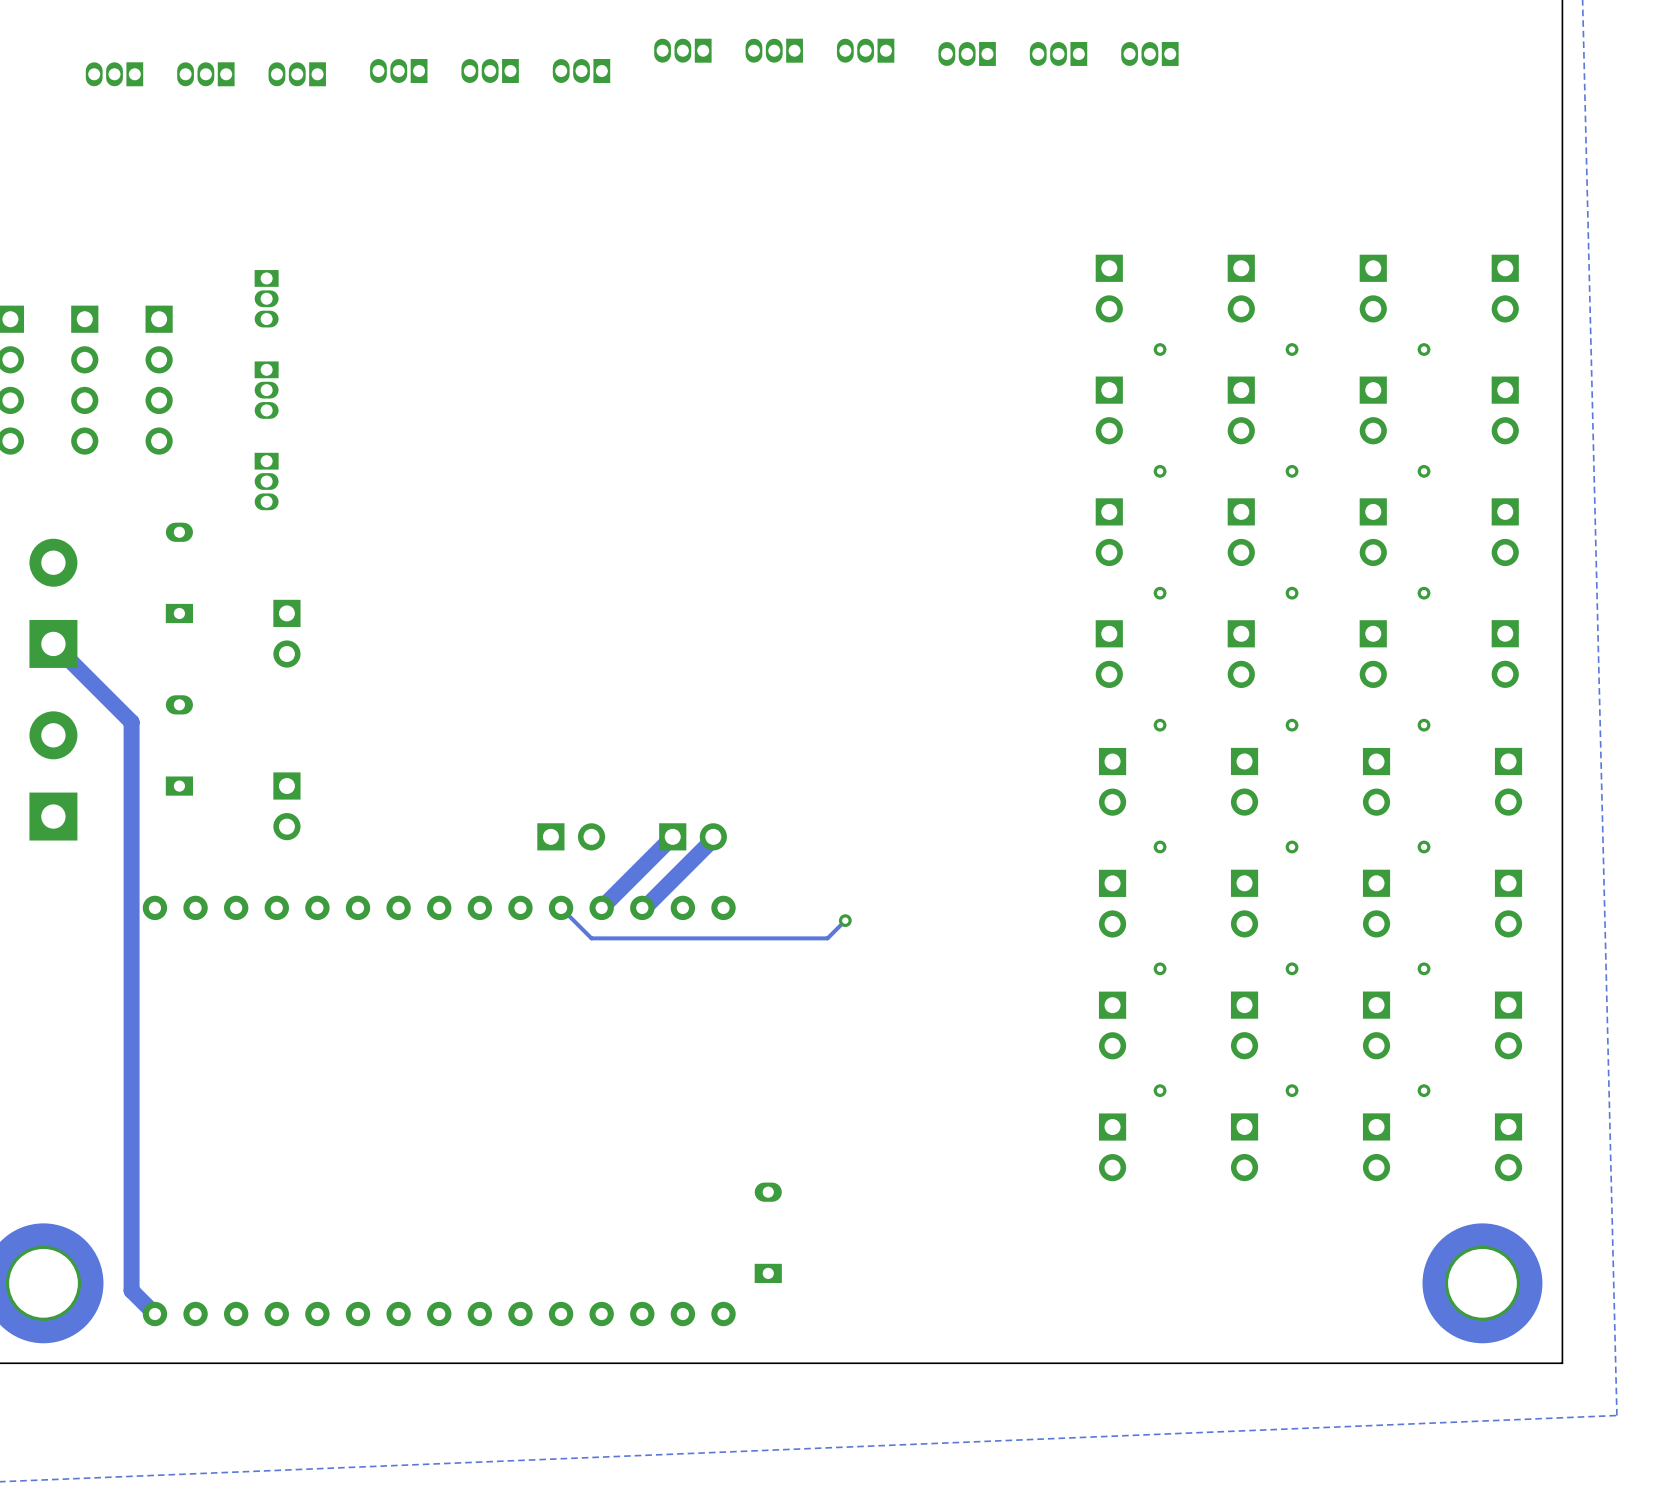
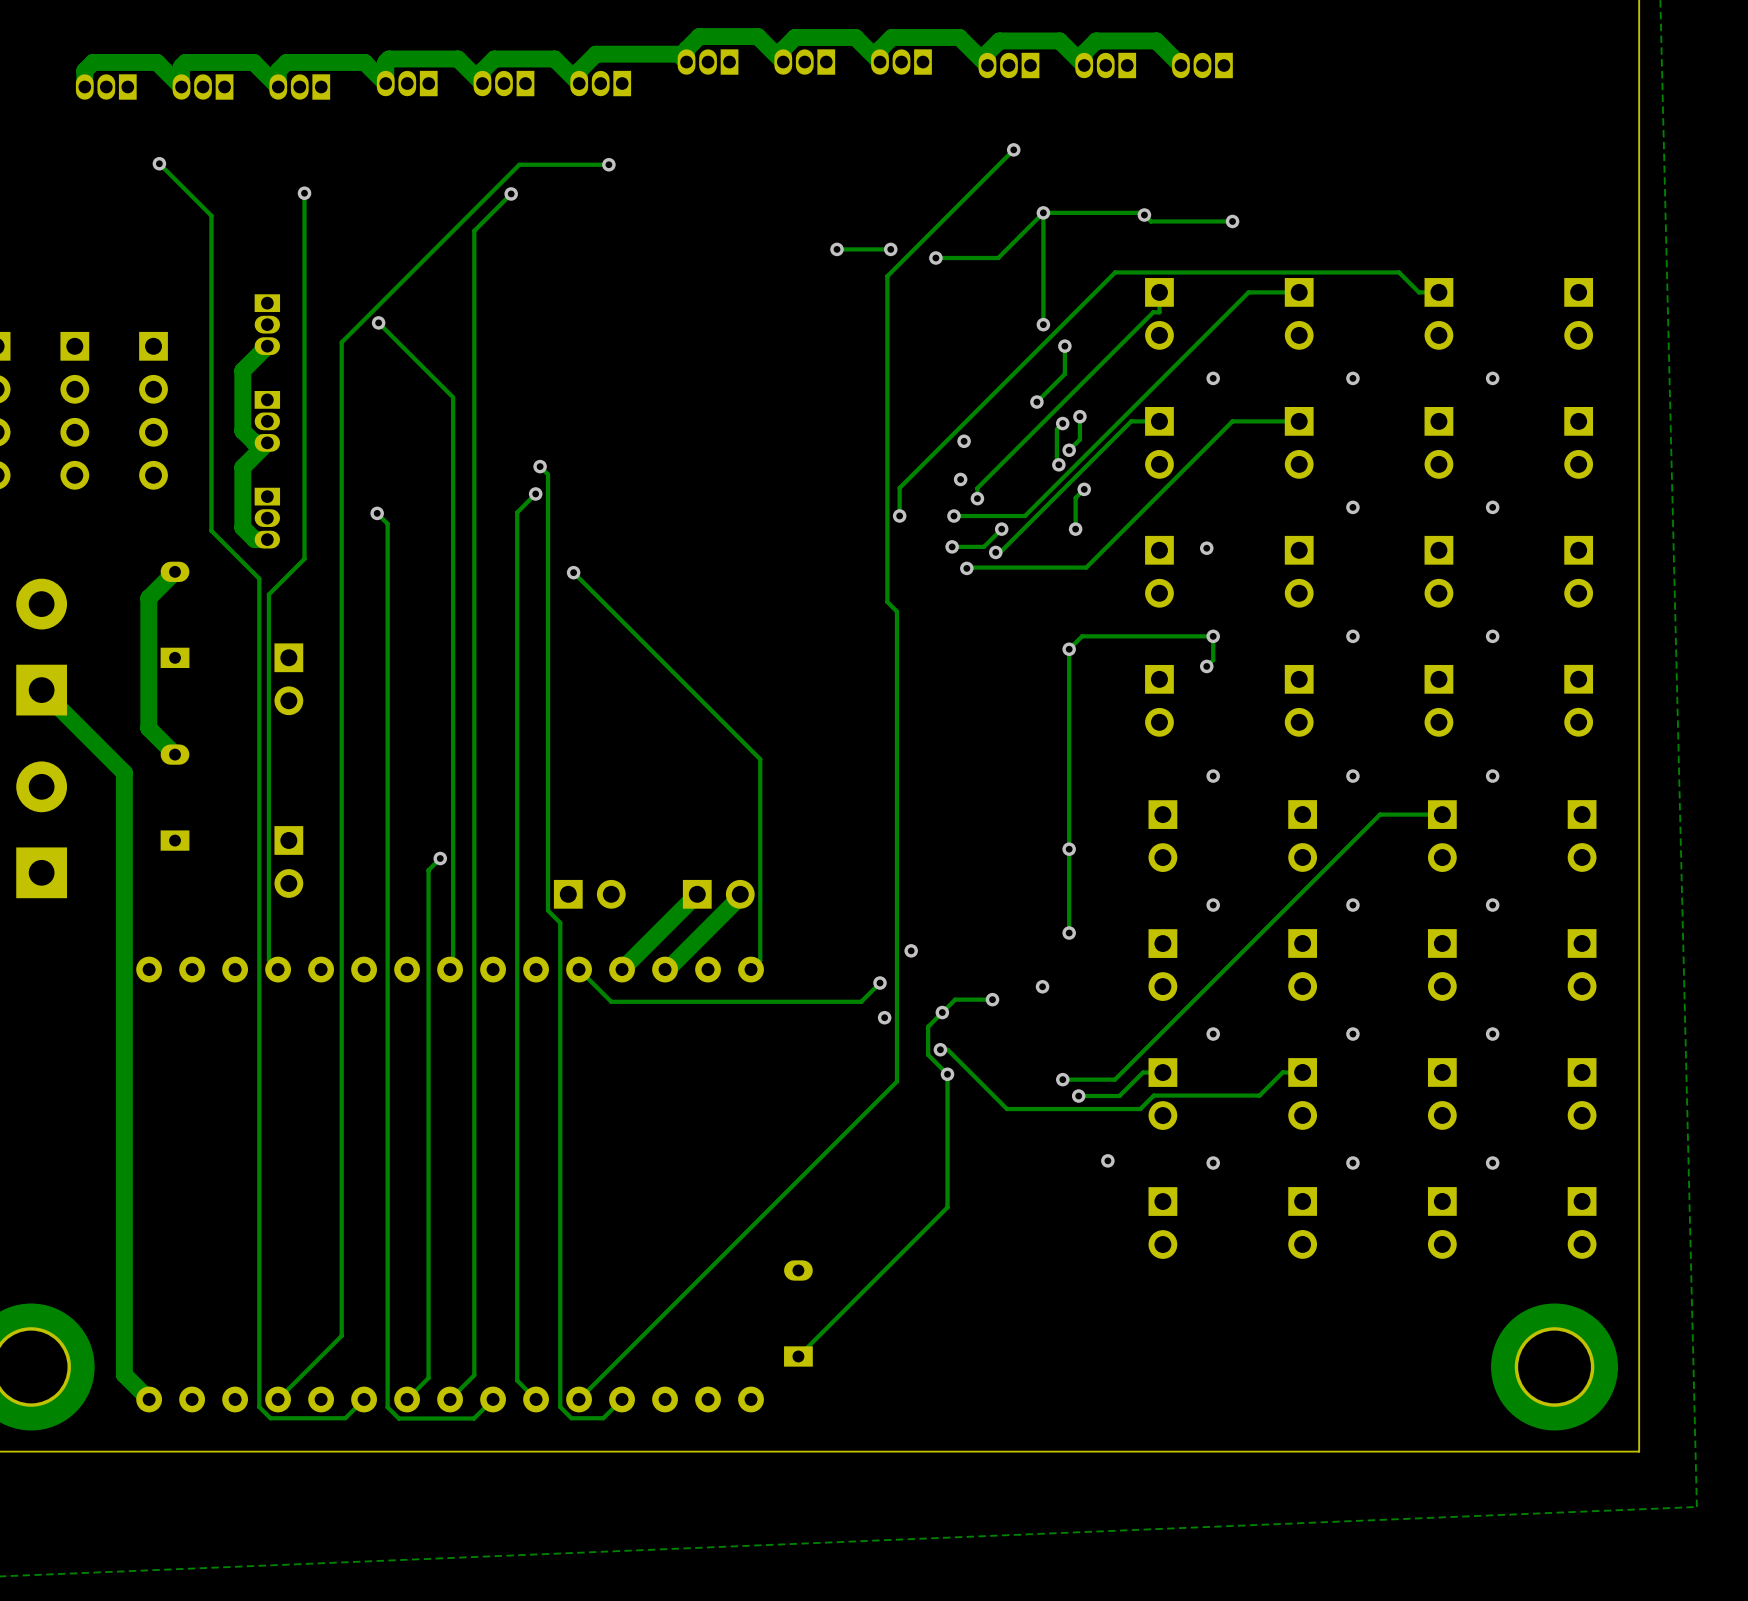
track: none -> (1180, 65) (1156, 40) (1096, 40) (1084, 52) (1084, 65) (1059, 40) (999, 40) (987, 52) (987, 65) (959, 37) (891, 37) (880, 49) (880, 62) (855, 37) (795, 37) (783, 49) (783, 62) (757, 36) (699, 36) (686, 49) (686, 62) (678, 54) (595, 54) (579, 70) (579, 83) (554, 58) (494, 58) (482, 70) (482, 83) (457, 58) (388, 58) (385, 62) (385, 83) (364, 62) (286, 62) (278, 70) (278, 87) (253, 62) (185, 62) (181, 66) (181, 87) (156, 62) (93, 62) (84, 70) (84, 87)
track: none -> (1013, 149) (887, 276) (887, 601) (896, 611) (896, 1081) (579, 1399)
via: none -> (1013, 149)
track: none -> (159, 163) (211, 215) (211, 530) (259, 578) (259, 1407) (270, 1418) (345, 1418) (364, 1399)
via: none -> (159, 163)
track: none -> (608, 164) (519, 164) (341, 342) (341, 1335) (278, 1399)
via: none -> (608, 164)
track: none -> (304, 193) (304, 558) (268, 594) (268, 960) (278, 969)
via: none -> (304, 193)
track: none -> (511, 193) (474, 230) (474, 1375) (450, 1399)
via: none -> (511, 193)
track: none -> (1043, 212) (1043, 324)
track: none -> (1043, 212) (998, 258) (935, 258)
track: none -> (1043, 212) (1142, 212) (1150, 221) (1232, 221)
via: none -> (1043, 212)
via: none -> (1144, 215)
via: none -> (1232, 221)
via: none -> (837, 249)
track: none -> (890, 249) (837, 249)
via: none -> (890, 249)
via: none -> (935, 258)
track: none -> (1159, 292) (1159, 312) (1153, 312) (977, 488) (977, 498)
track: none -> (1299, 292) (1248, 292) (1024, 516) (953, 516)
track: none -> (1438, 292) (1419, 292) (1399, 272) (1115, 272) (899, 487) (899, 515)
track: none -> (378, 322) (453, 397) (453, 966) (450, 969)
via: none -> (378, 322)
via: none -> (1043, 324)
track: none -> (267, 346) (242, 370) (242, 430) (254, 442) (267, 442) (242, 467) (242, 527) (254, 539) (267, 539)
track: none -> (1064, 346) (1064, 374) (1036, 402)
via: none -> (1064, 346)
via: none -> (1036, 402)
track: none -> (1079, 416) (1079, 439) (1069, 450)
via: none -> (1079, 416)
track: none -> (1159, 421) (1131, 421) (1000, 552) (995, 552)
track: none -> (1299, 421) (1232, 421) (1086, 567) (966, 568)
track: none -> (1062, 423) (1056, 429) (1056, 462) (1058, 464)
via: none -> (1062, 423)
via: none -> (964, 441)
via: none -> (1069, 450)
via: none -> (1058, 464)
track: none -> (540, 466) (548, 474) (548, 910) (560, 922) (560, 1407) (571, 1418) (603, 1418) (622, 1399)
via: none -> (540, 466)
via: none -> (960, 479)
track: none -> (1084, 489) (1075, 497) (1075, 529)
via: none -> (1084, 489)
track: none -> (535, 493) (517, 512) (517, 1380) (536, 1399)
via: none -> (535, 493)
via: none -> (977, 498)
via position: (1160, 471) -> (1206, 548)
track: none -> (377, 513) (387, 523) (387, 1407) (398, 1418) (474, 1418) (493, 1399)
via: none -> (377, 513)
via: none -> (899, 515)
via: none -> (953, 516)
track: none -> (1001, 529) (983, 546) (952, 546)
via: none -> (1001, 529)
via: none -> (1075, 529)
via: none -> (952, 546)
via: none -> (995, 552)
via: none -> (966, 568)
track: none -> (175, 571) (148, 598) (148, 728) (175, 754)
track: none -> (573, 572) (760, 759) (760, 960) (751, 969)
via: none -> (573, 572)
via: none -> (1069, 649)
track: none -> (1206, 666) (1213, 660) (1213, 636) (1082, 636) (1069, 649) (1069, 933)
via: none -> (1206, 666)
track: none -> (1442, 814) (1380, 814) (1114, 1079) (1062, 1079)
via: none -> (1069, 849)
track: none -> (440, 858) (428, 870) (428, 1377) (407, 1399)
via: none -> (440, 858)
via: none -> (1069, 933)
via: none -> (911, 950)
via: none -> (1042, 986)
track: none -> (992, 999) (955, 999) (928, 1026) (928, 1054) (947, 1074) (947, 1207) (798, 1356)
via: none -> (992, 999)
via: none -> (942, 1012)
via: none -> (884, 1017)
track: none -> (940, 1049) (947, 1049) (1007, 1109) (1140, 1109) (1153, 1095) (1259, 1095) (1282, 1072) (1302, 1072)
via: none -> (940, 1049)
track: none -> (1162, 1072) (1142, 1072) (1119, 1096) (1078, 1096)
via: none -> (947, 1074)
via: none -> (1062, 1079)
via: none -> (1078, 1096)
via: none -> (1107, 1160)

